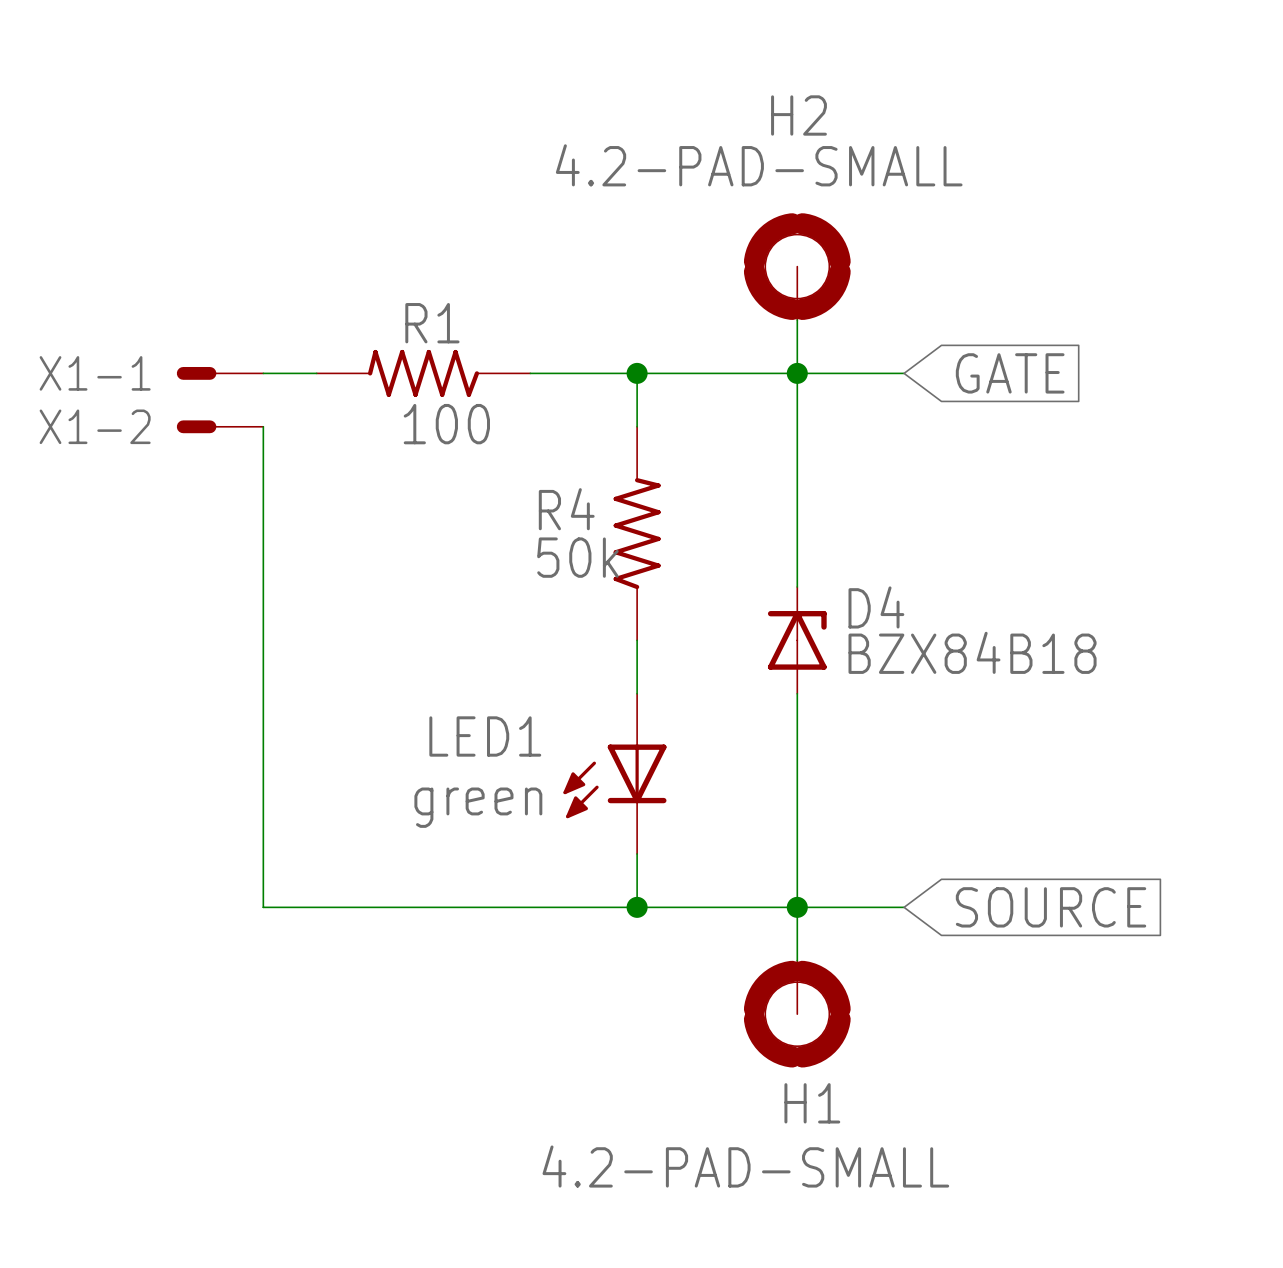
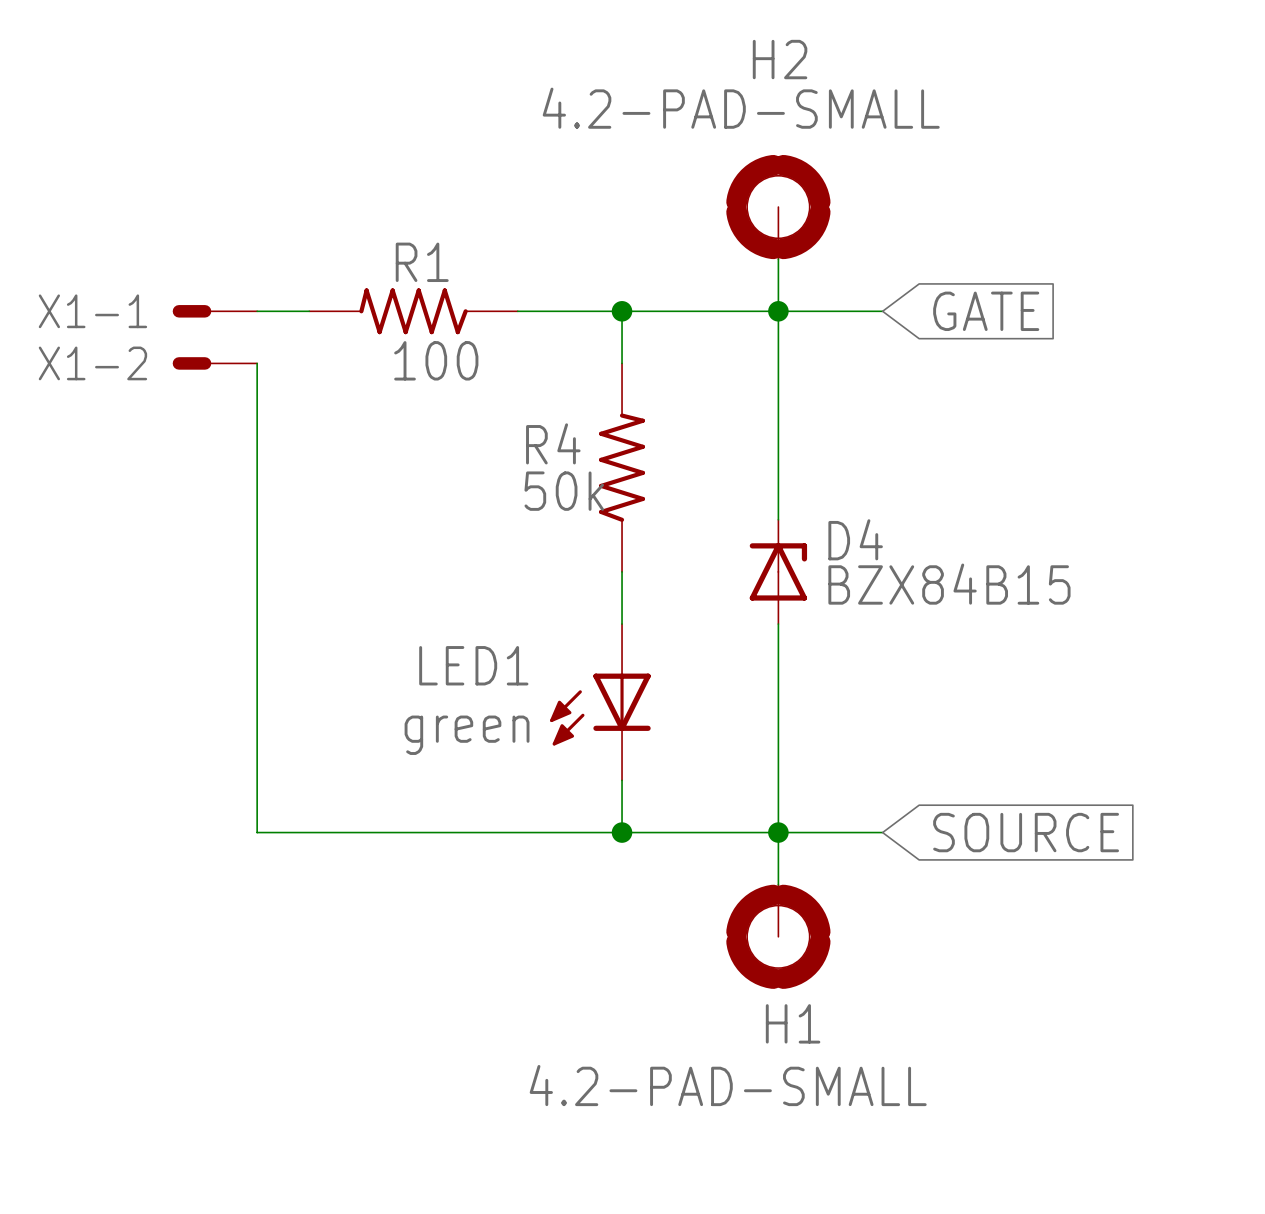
D4 value: BZX84B18 (972, 652) -> BZX84B15 (949, 584)

